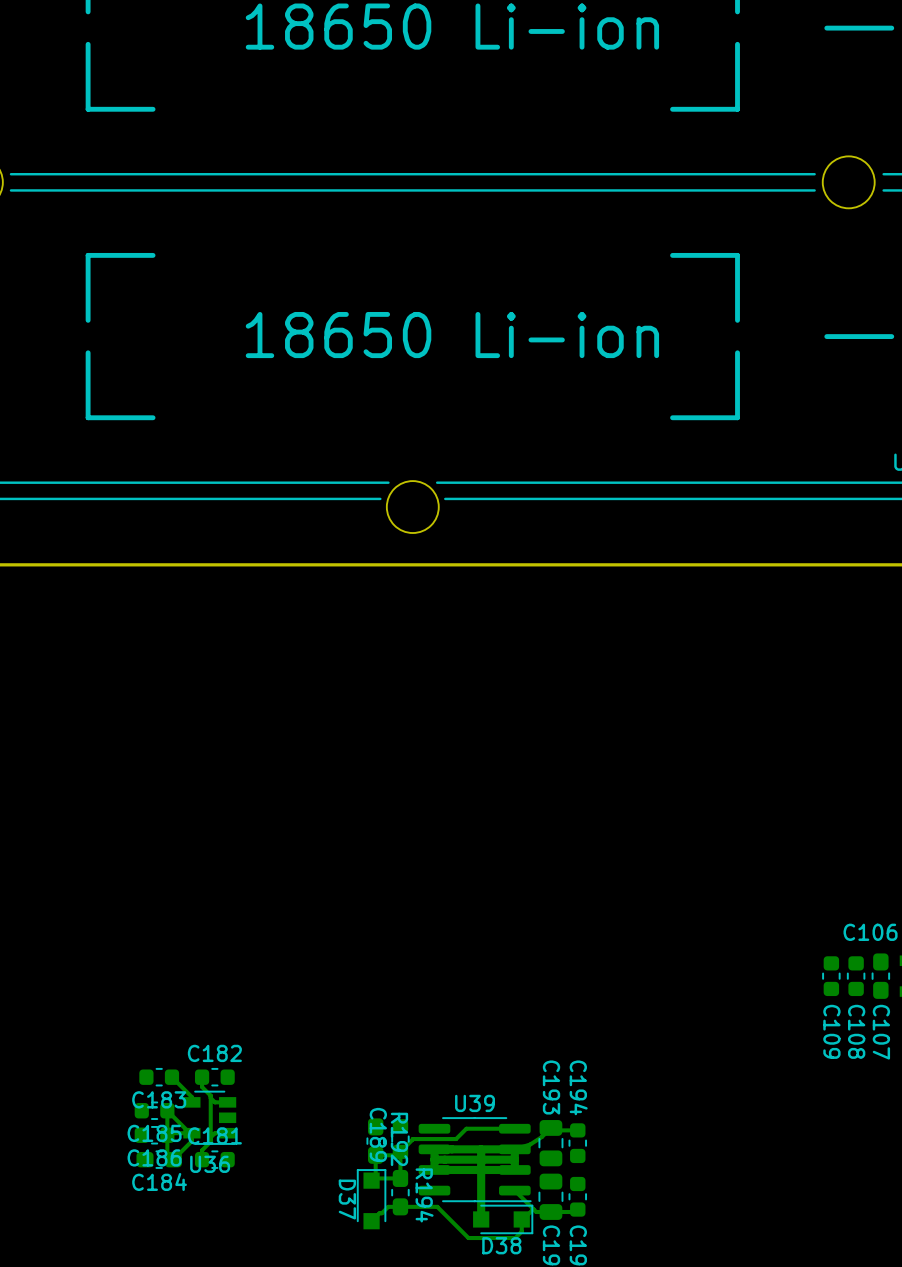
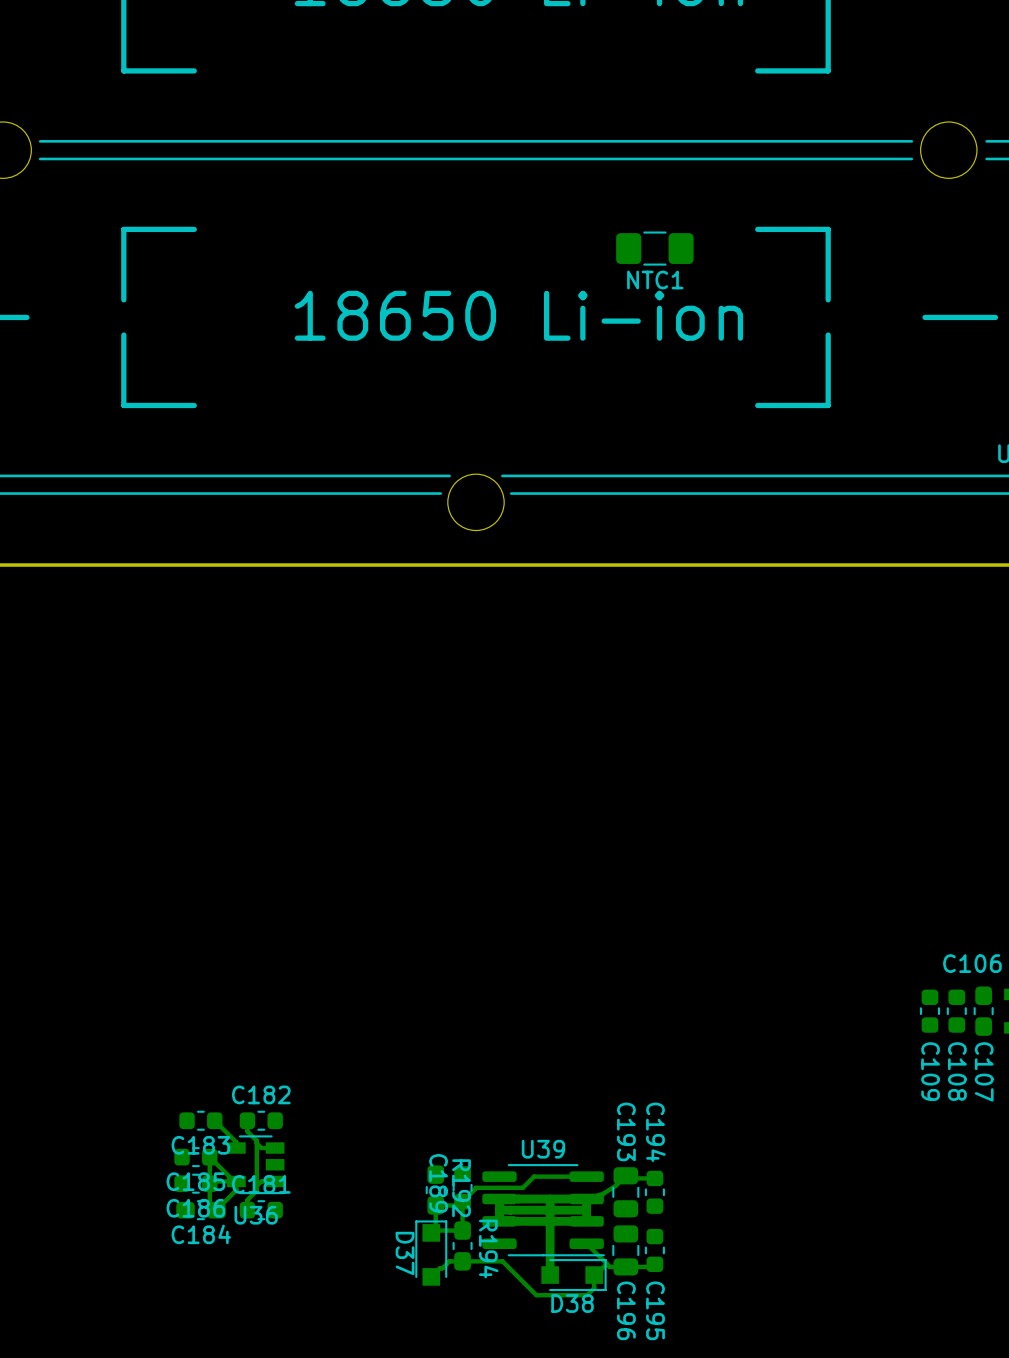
NTC1: none -> (654, 248)

